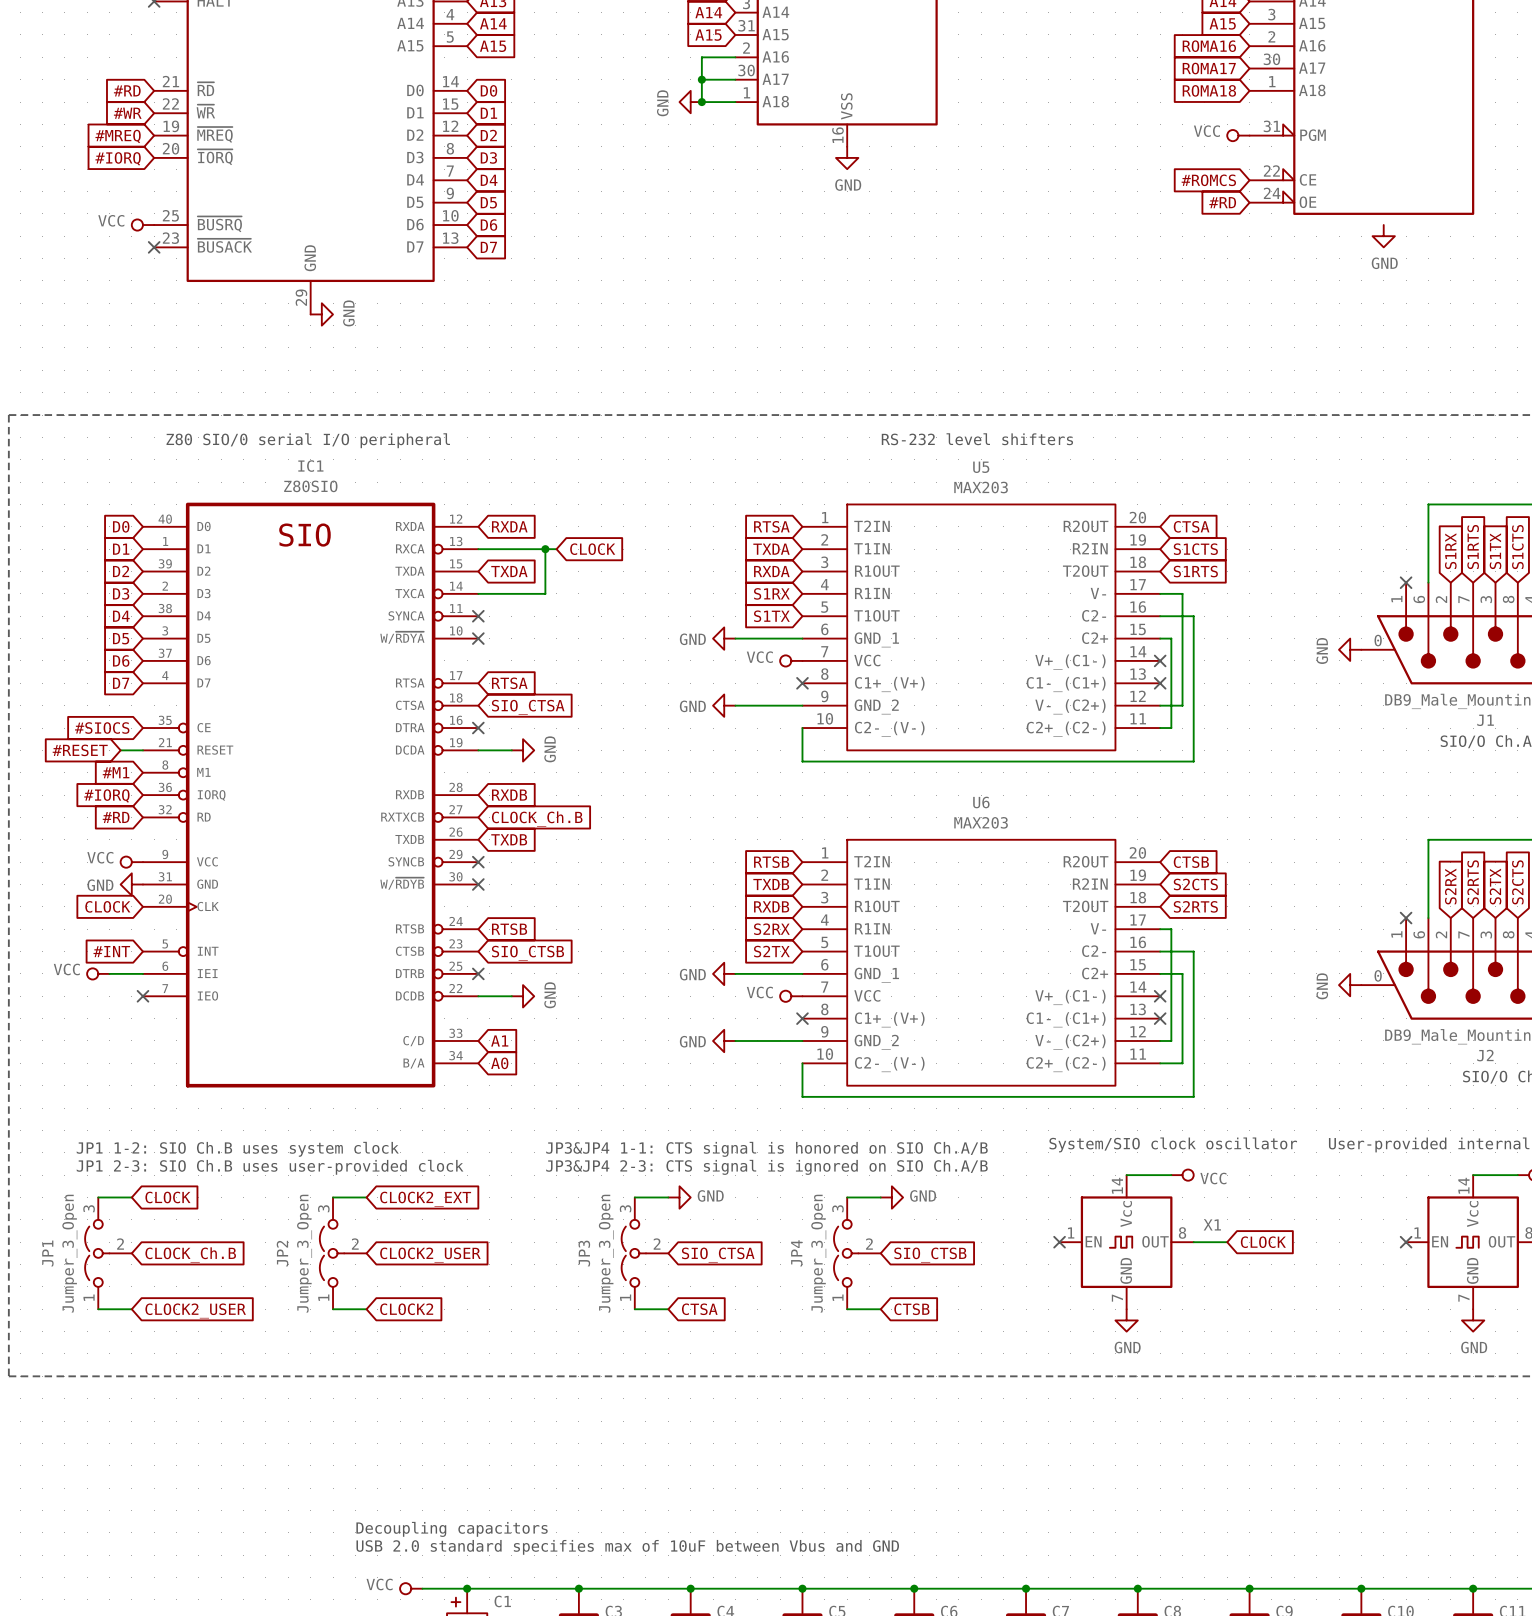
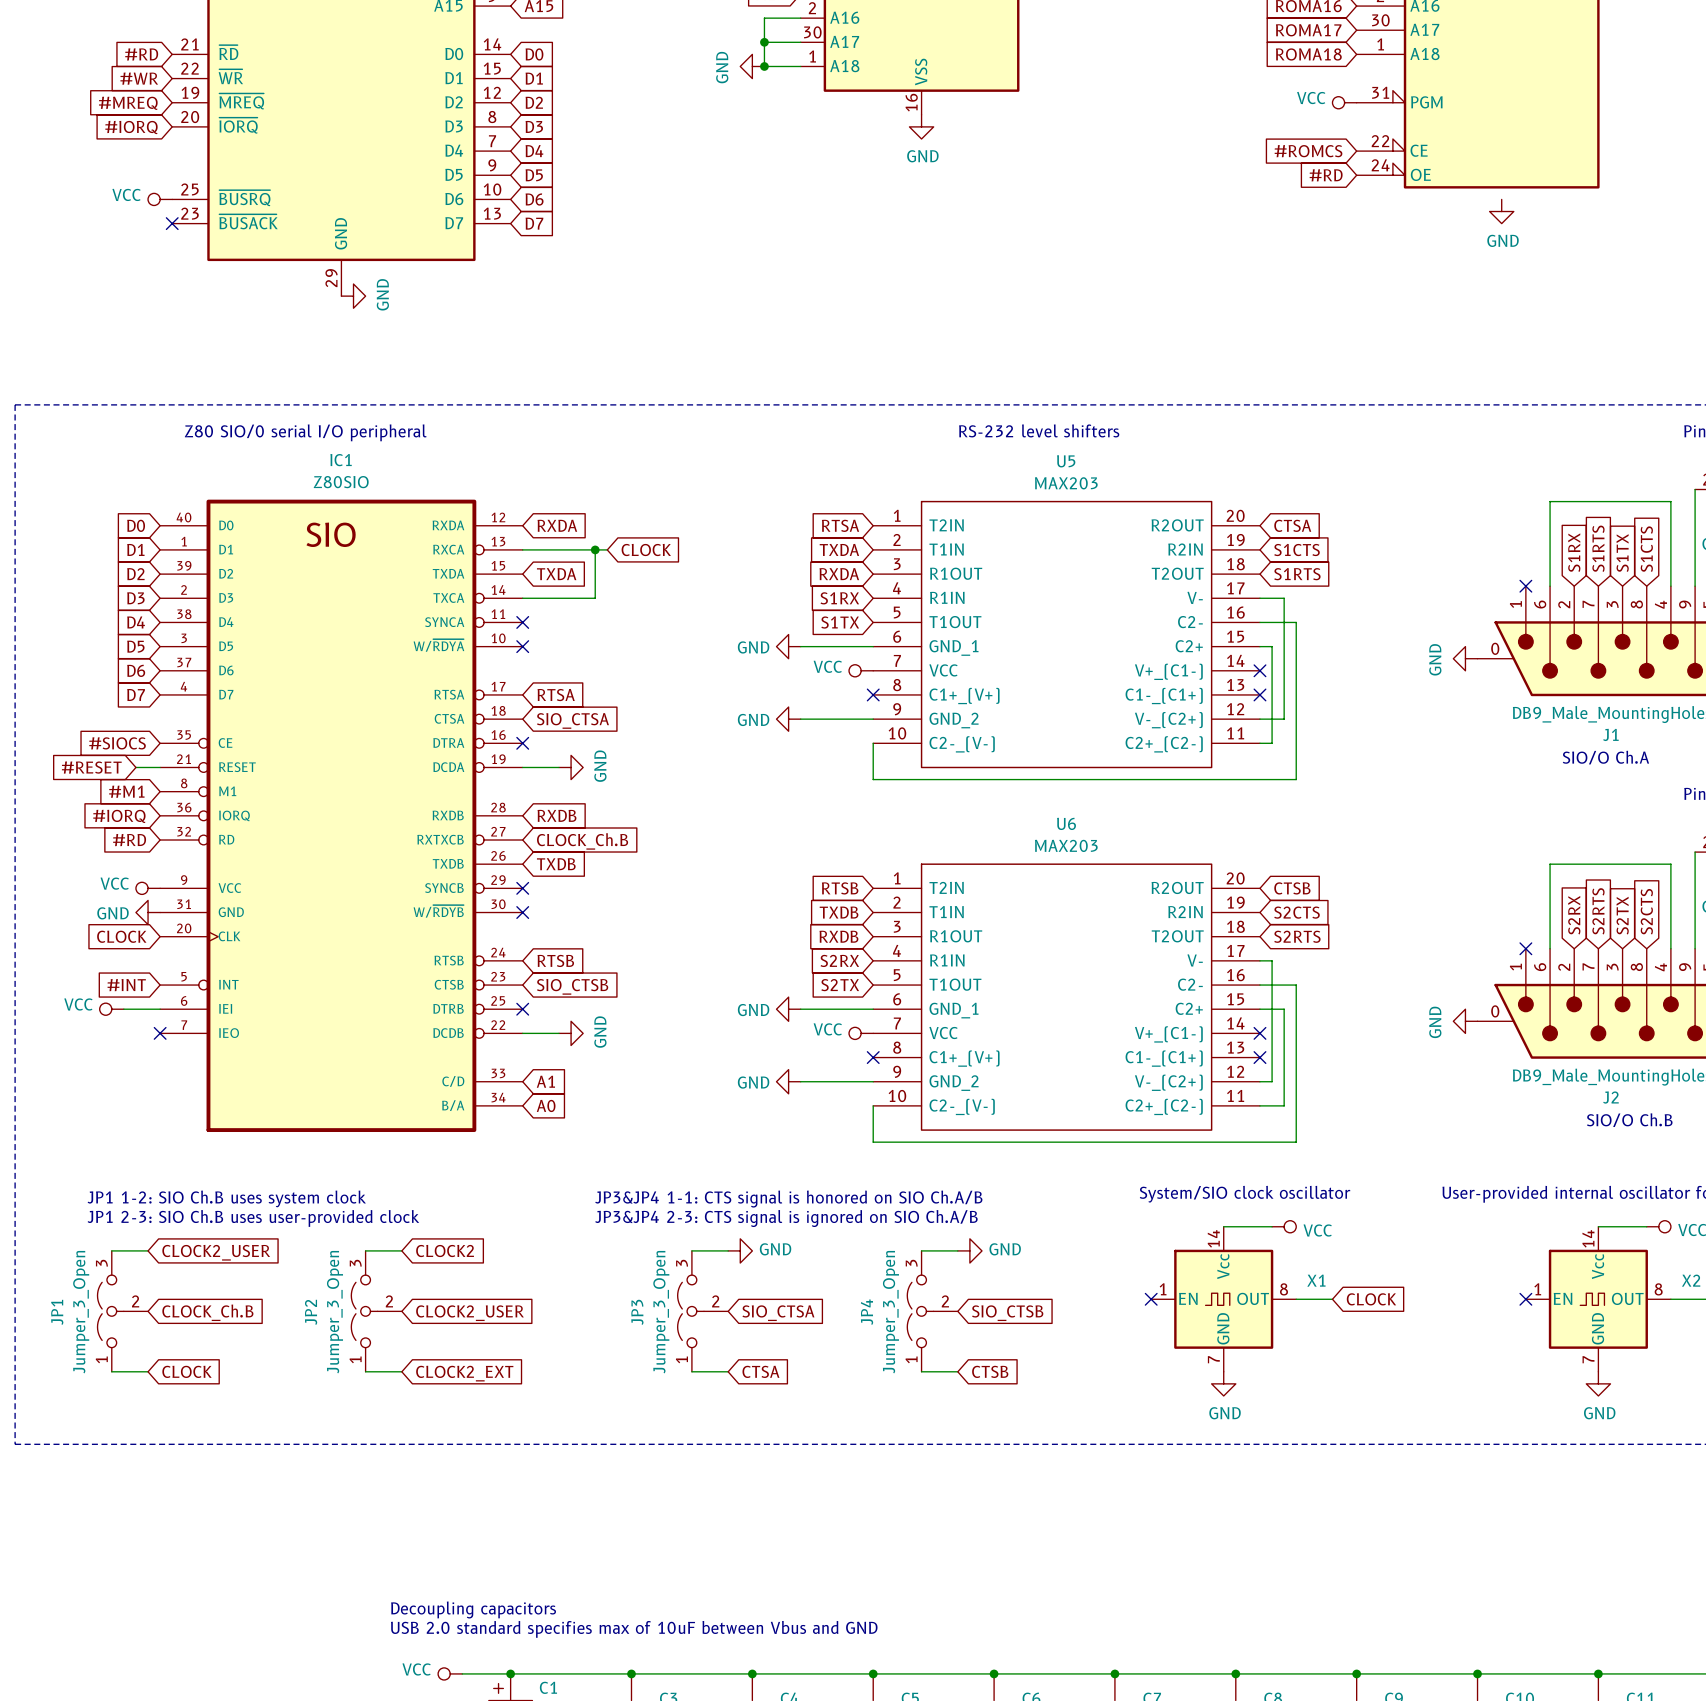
global label: CLOCK (167, 1197) -> CLOCK2_USER (216, 1252)
global label: CLOCK2_EXT (425, 1199) -> CLOCK2 (445, 1251)
global label: CLOCK2 (406, 1309) -> CLOCK2_EXT (464, 1373)
global label: CLOCK2_USER (195, 1310) -> CLOCK (187, 1371)

